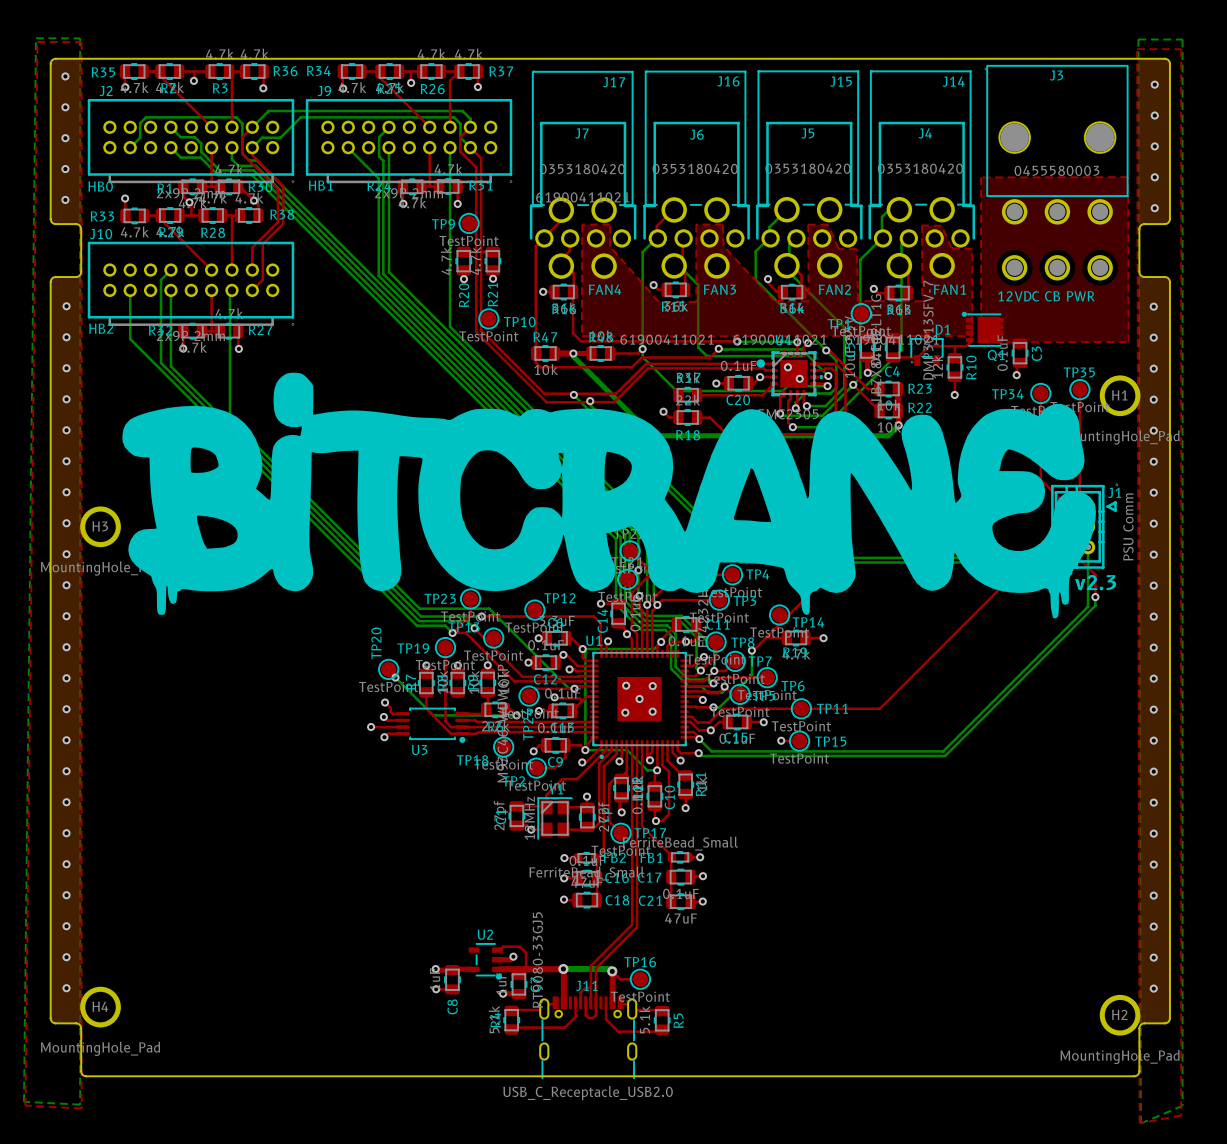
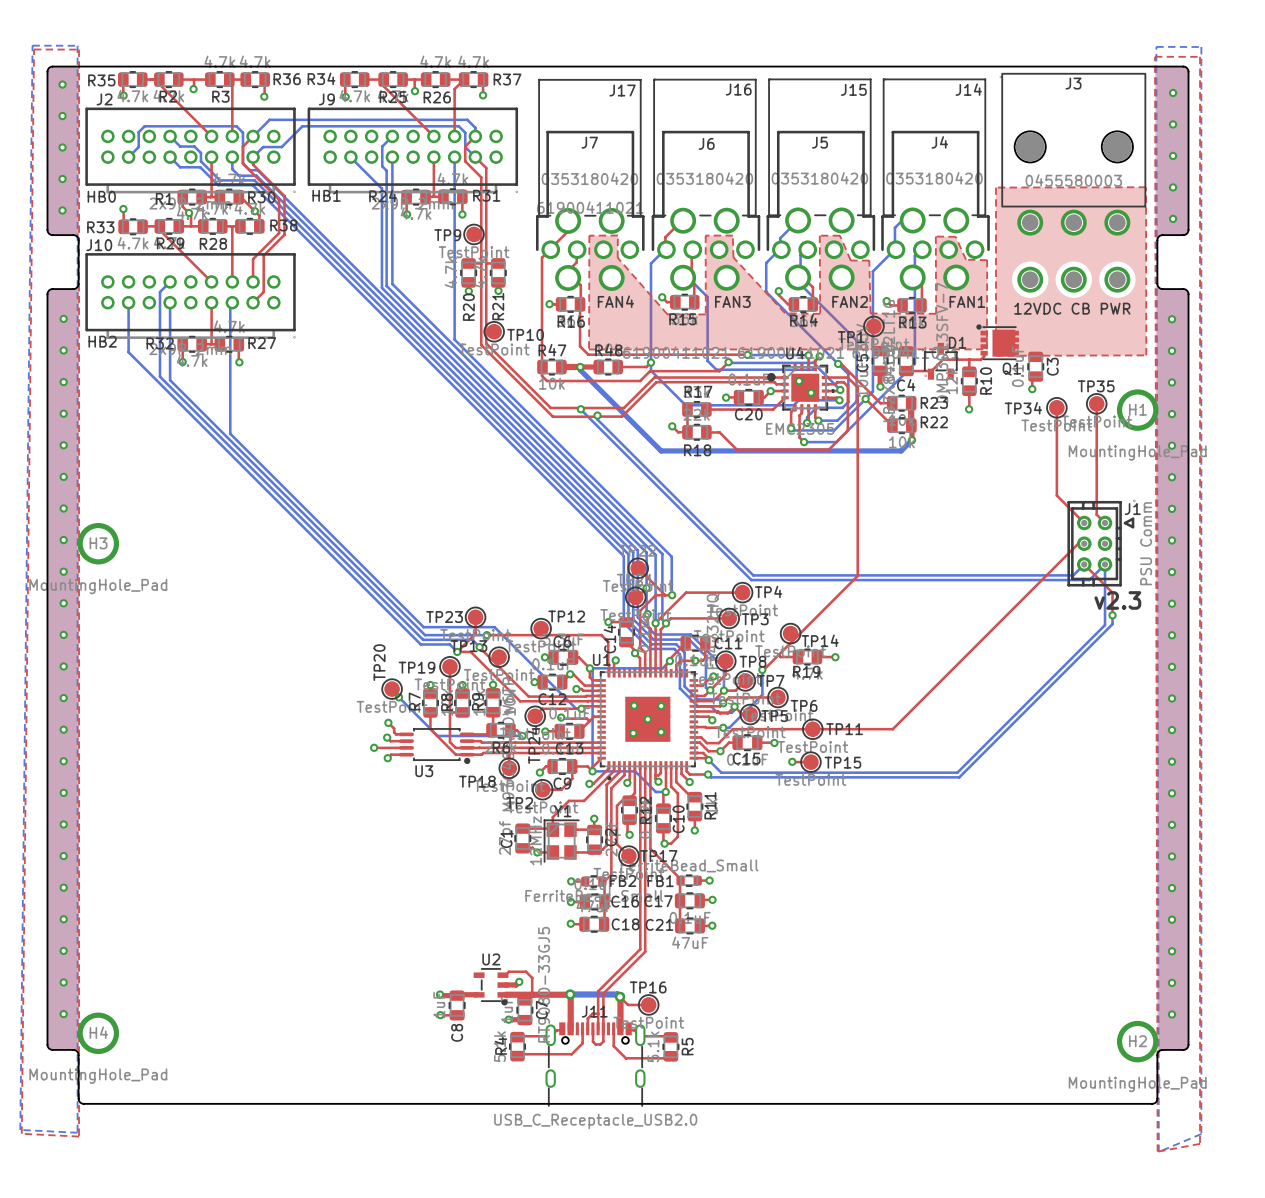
drawing: [122, 372, 1096, 619] -> none

